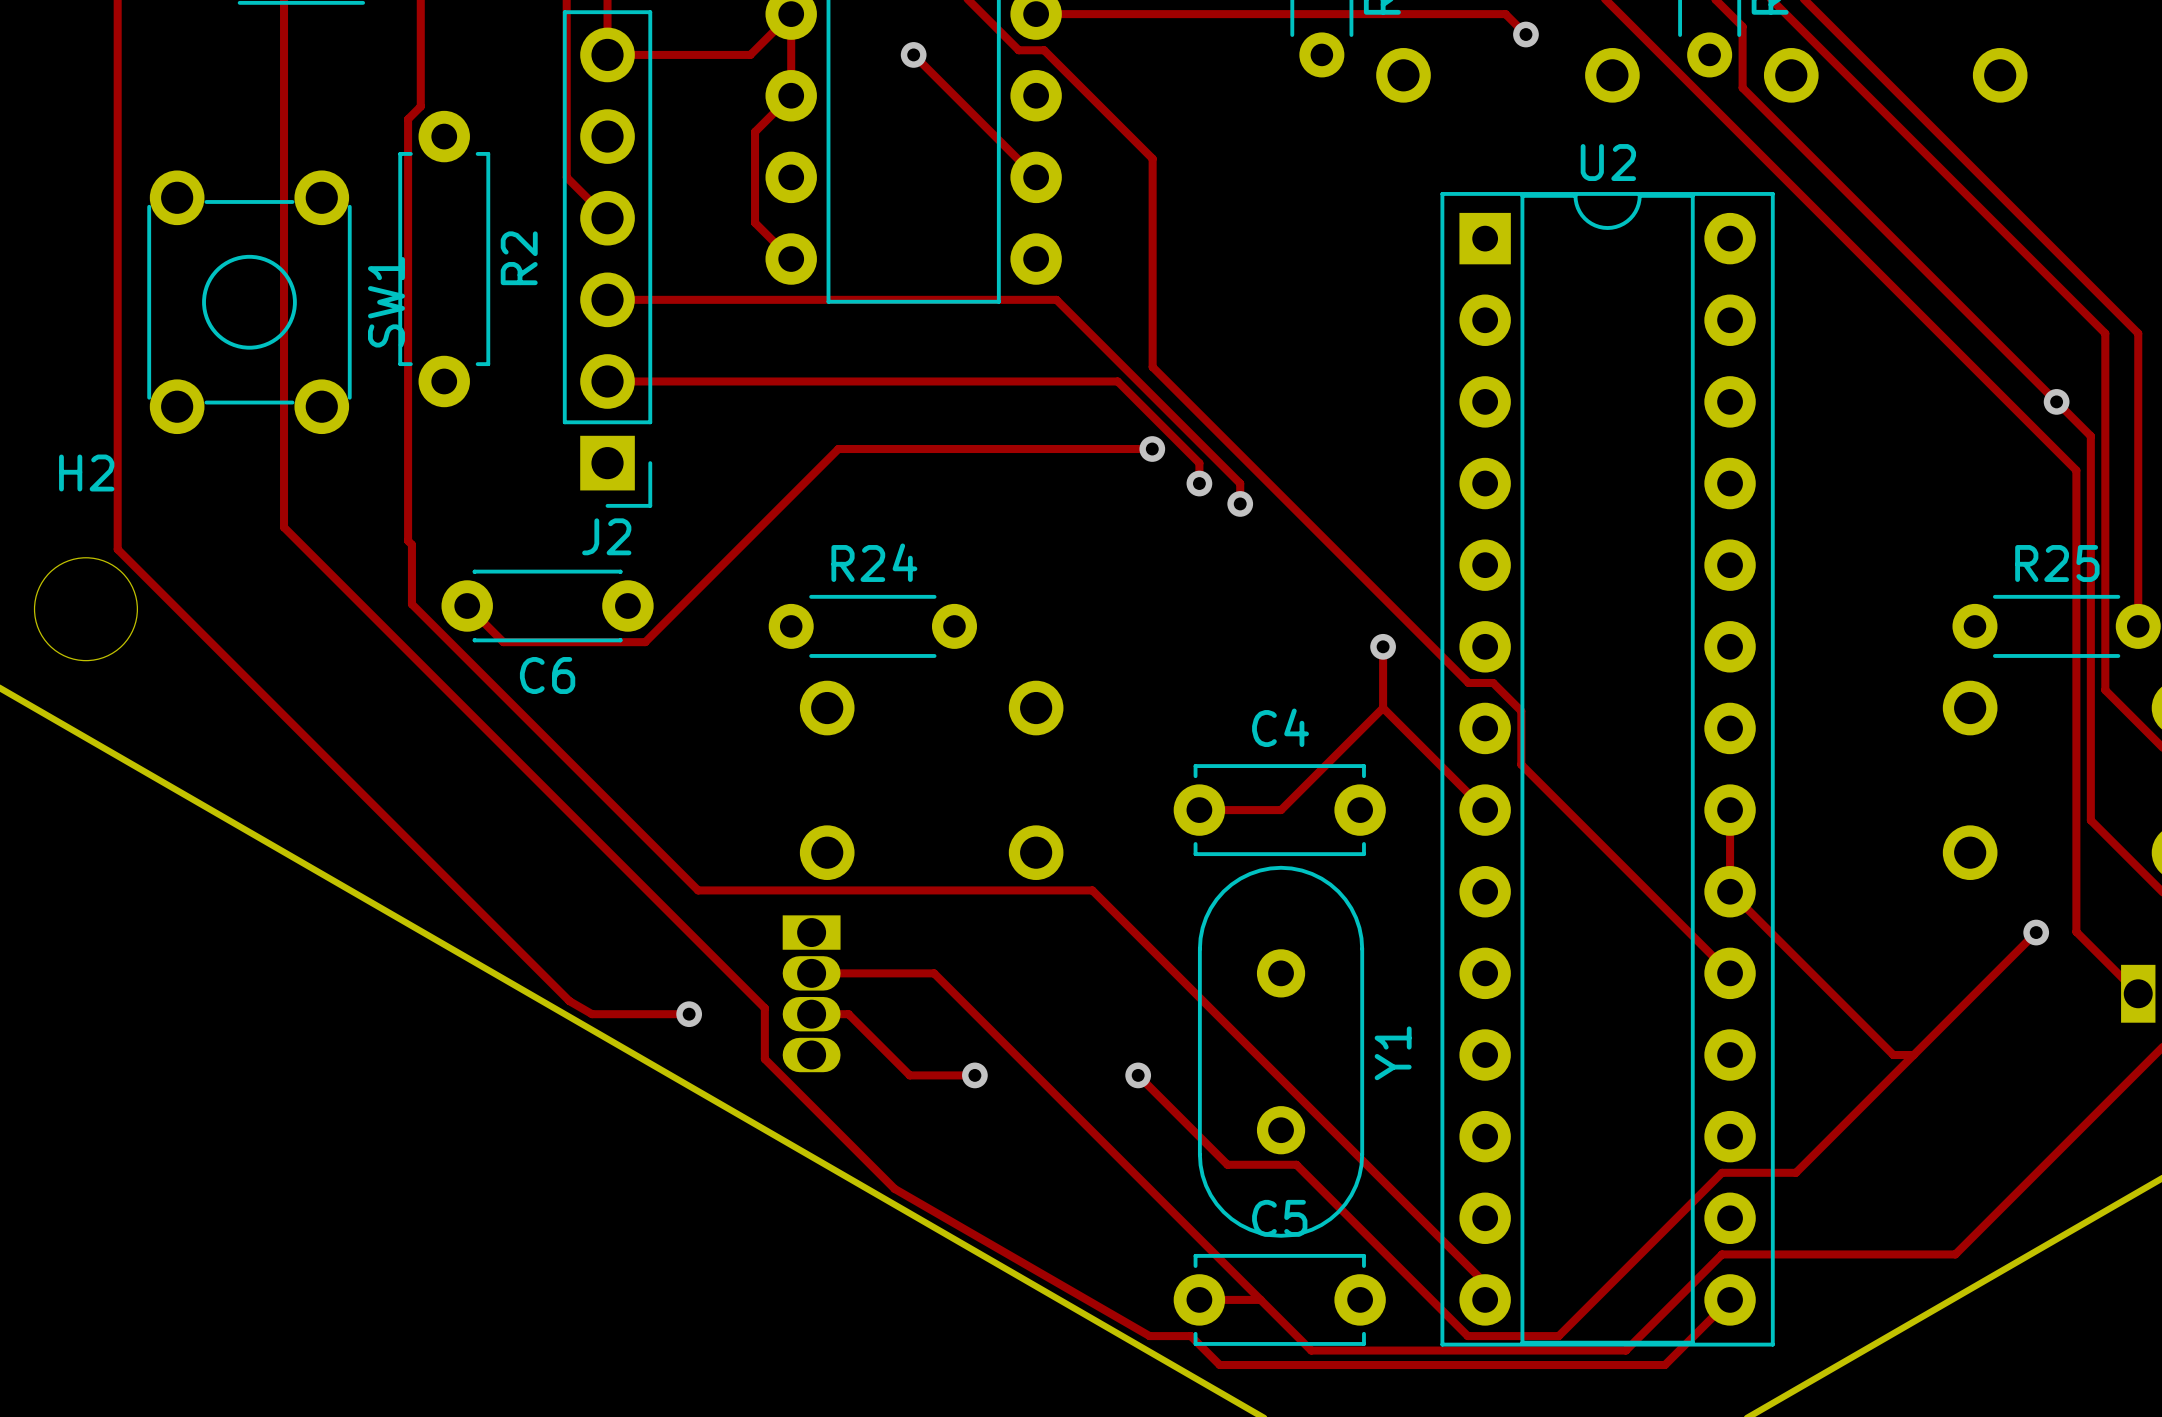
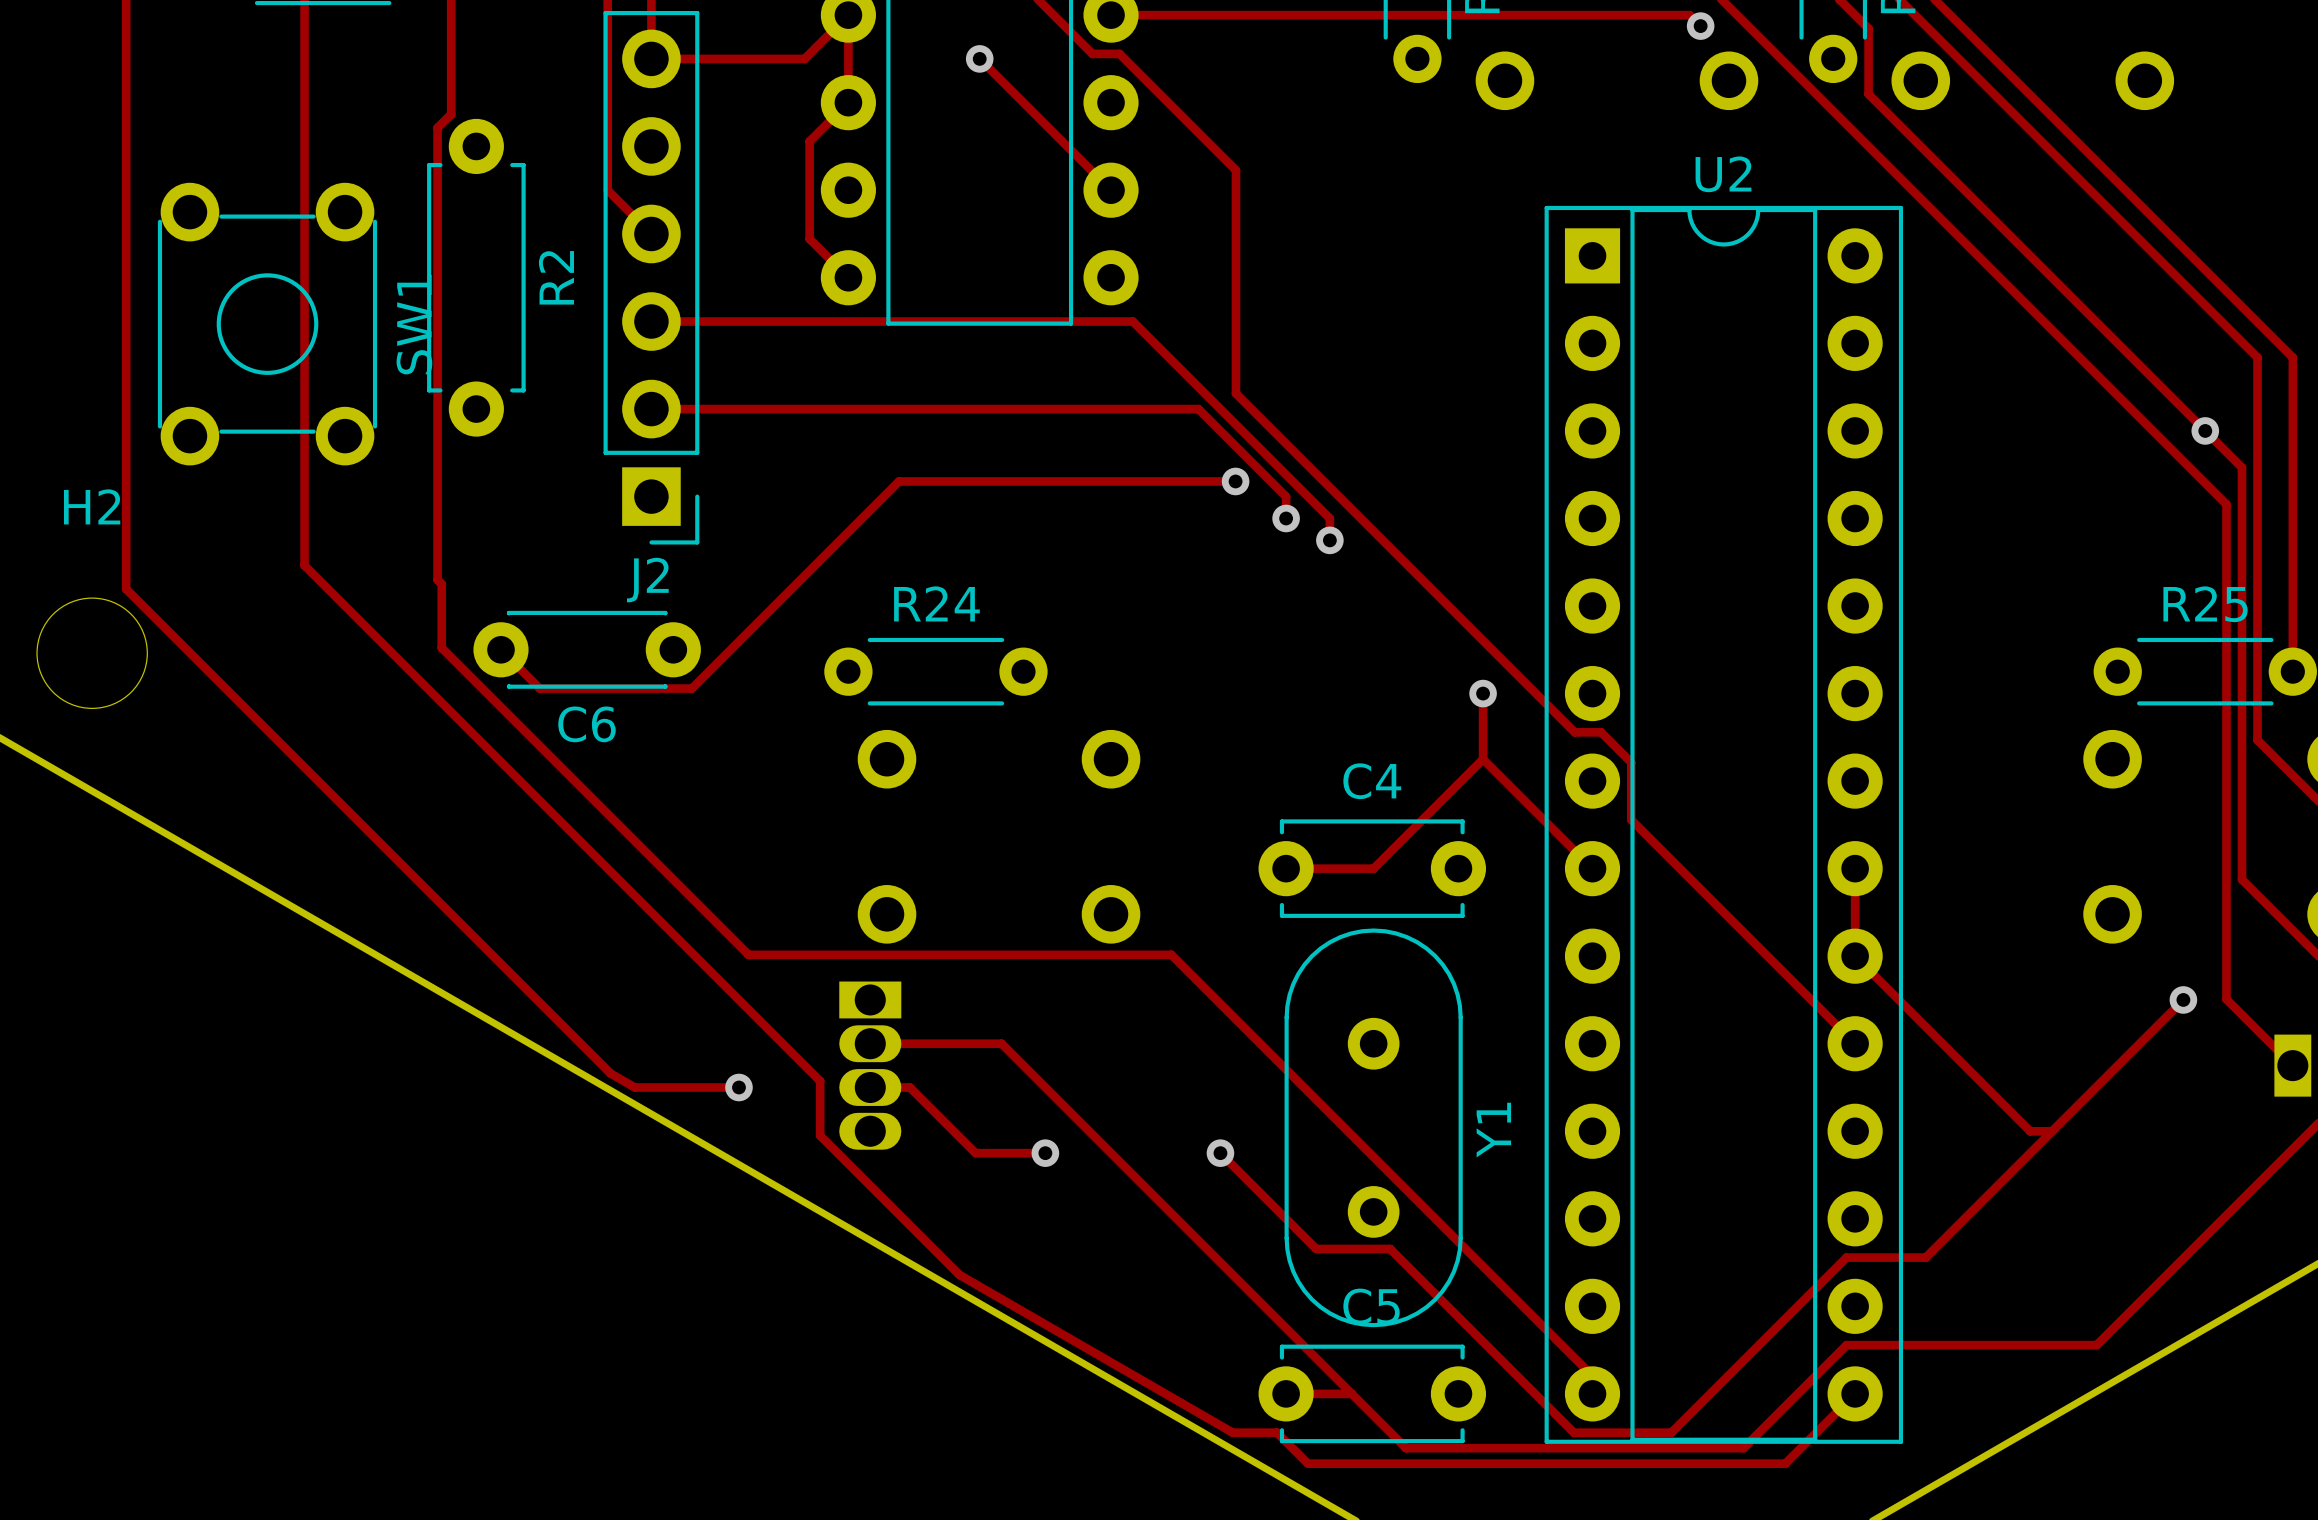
track: (1505, 14) (1525, 34) -> (1614, 15) (1689, 15) (1700, 26)
via: none -> (1700, 26)
via: (1525, 34) -> none

